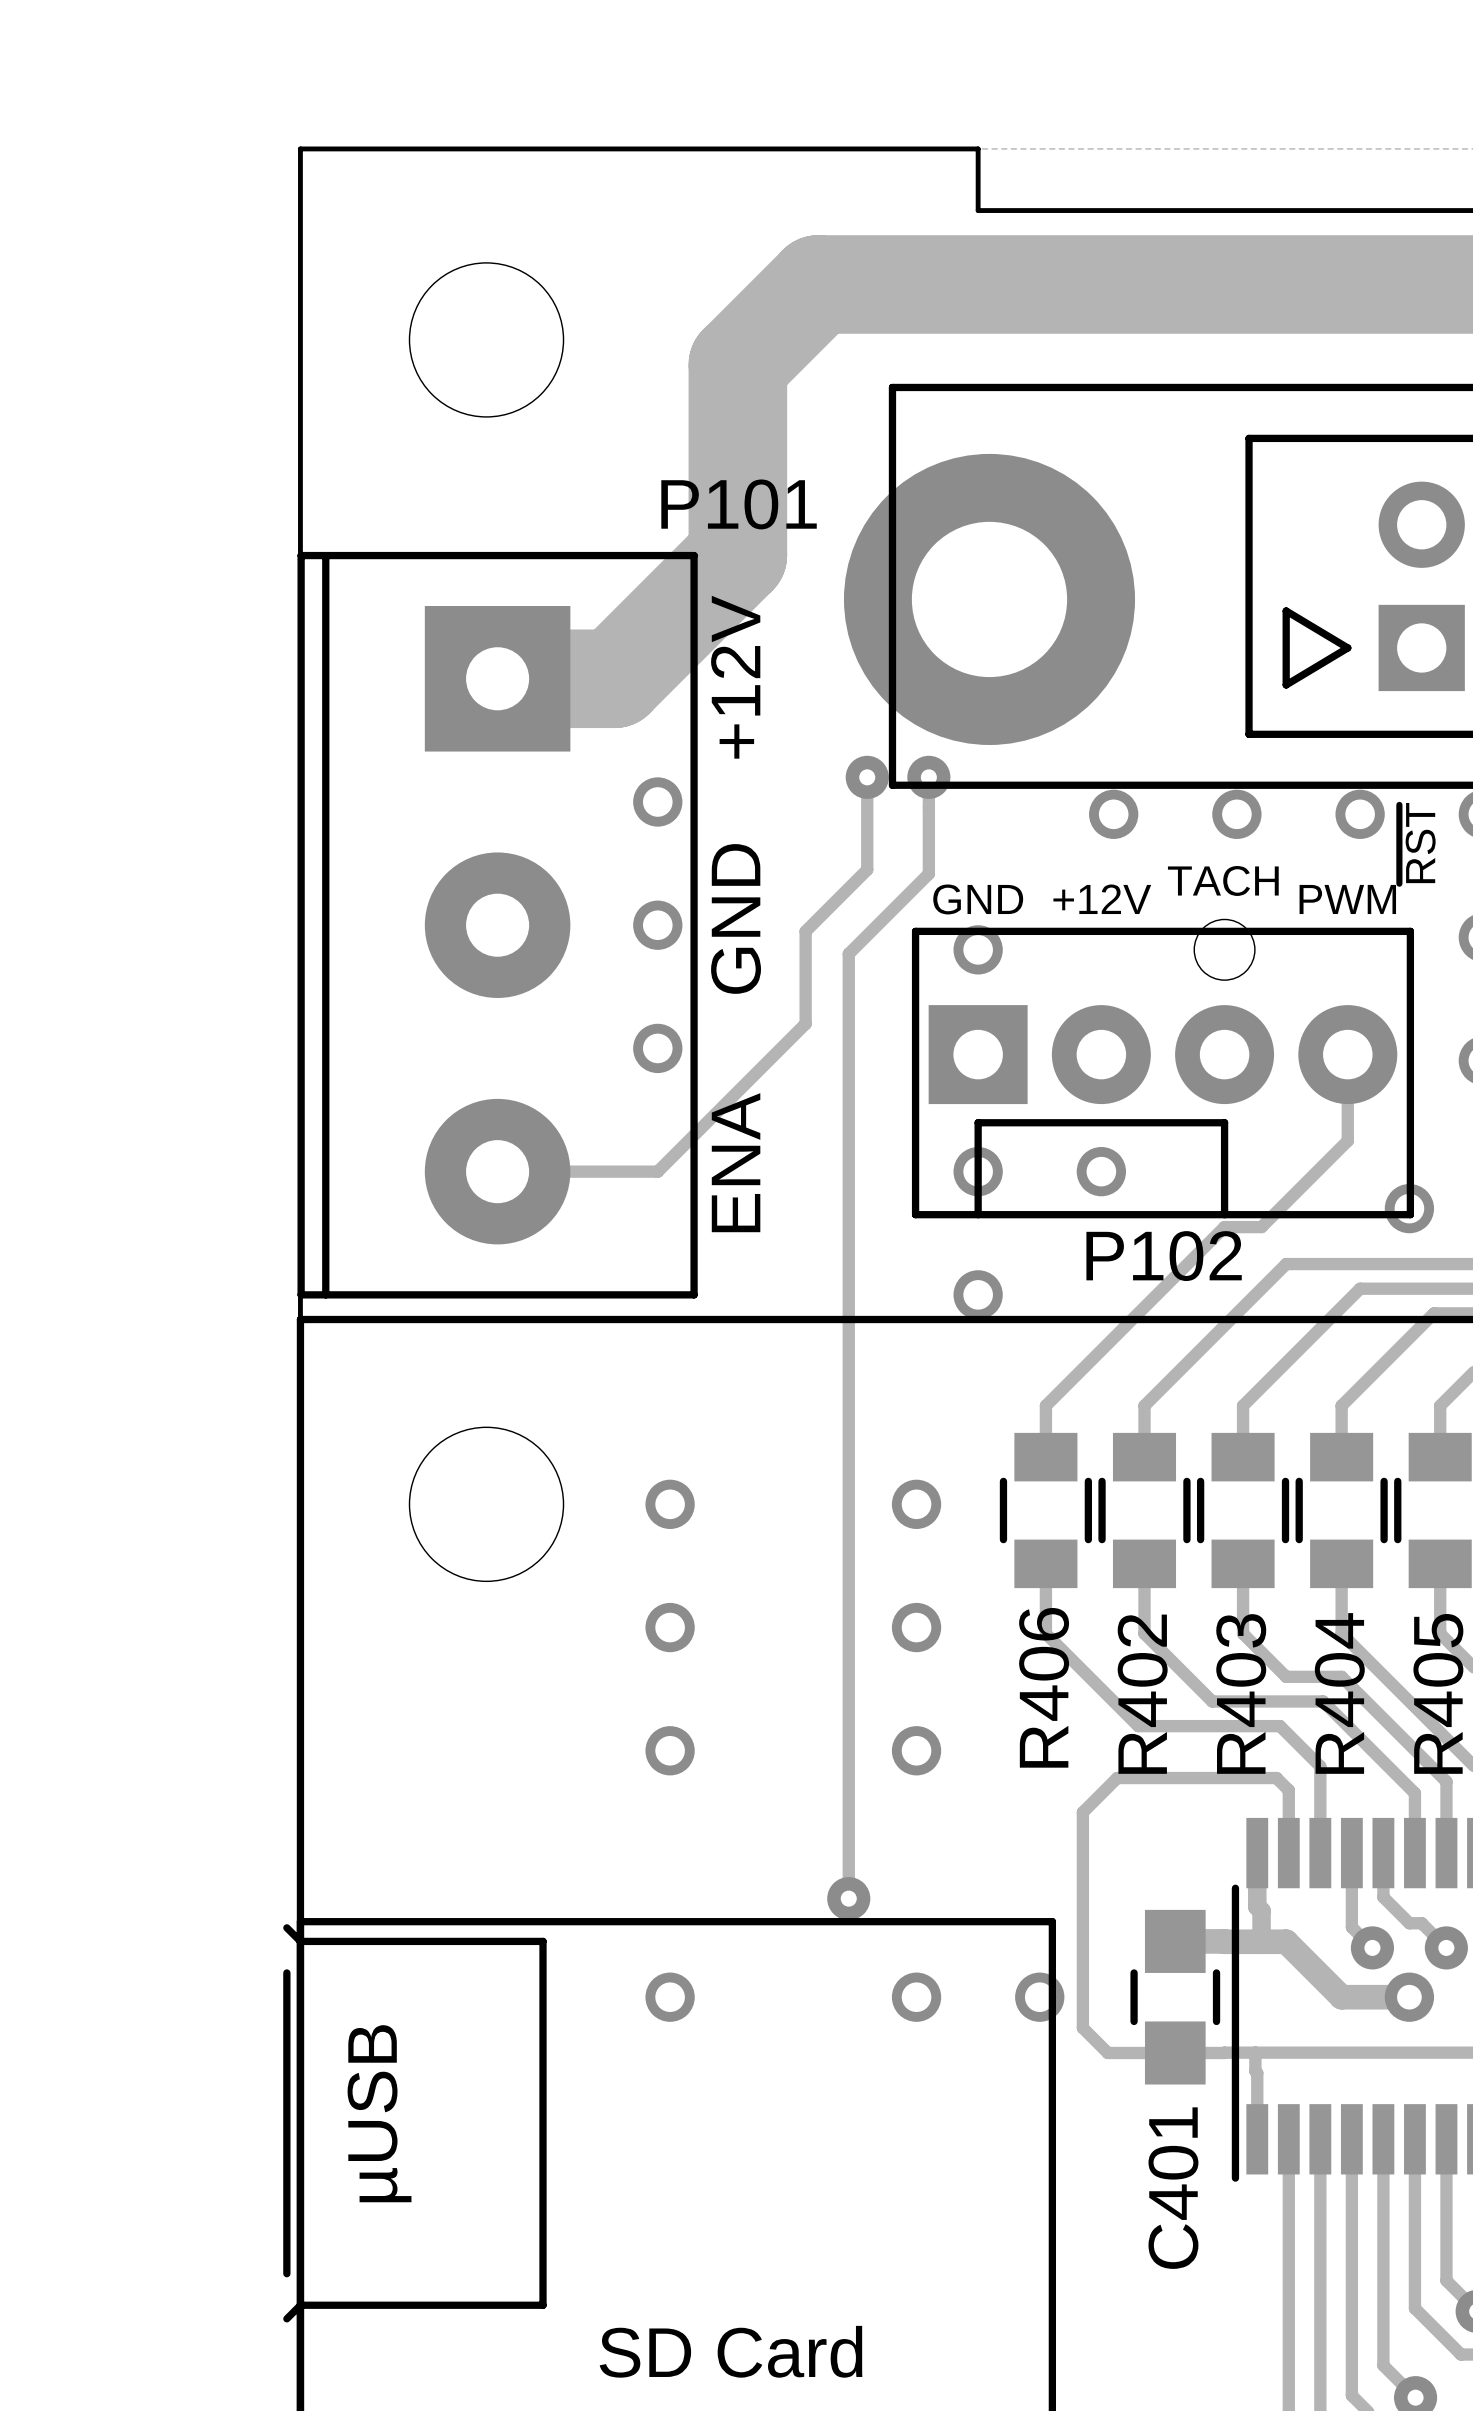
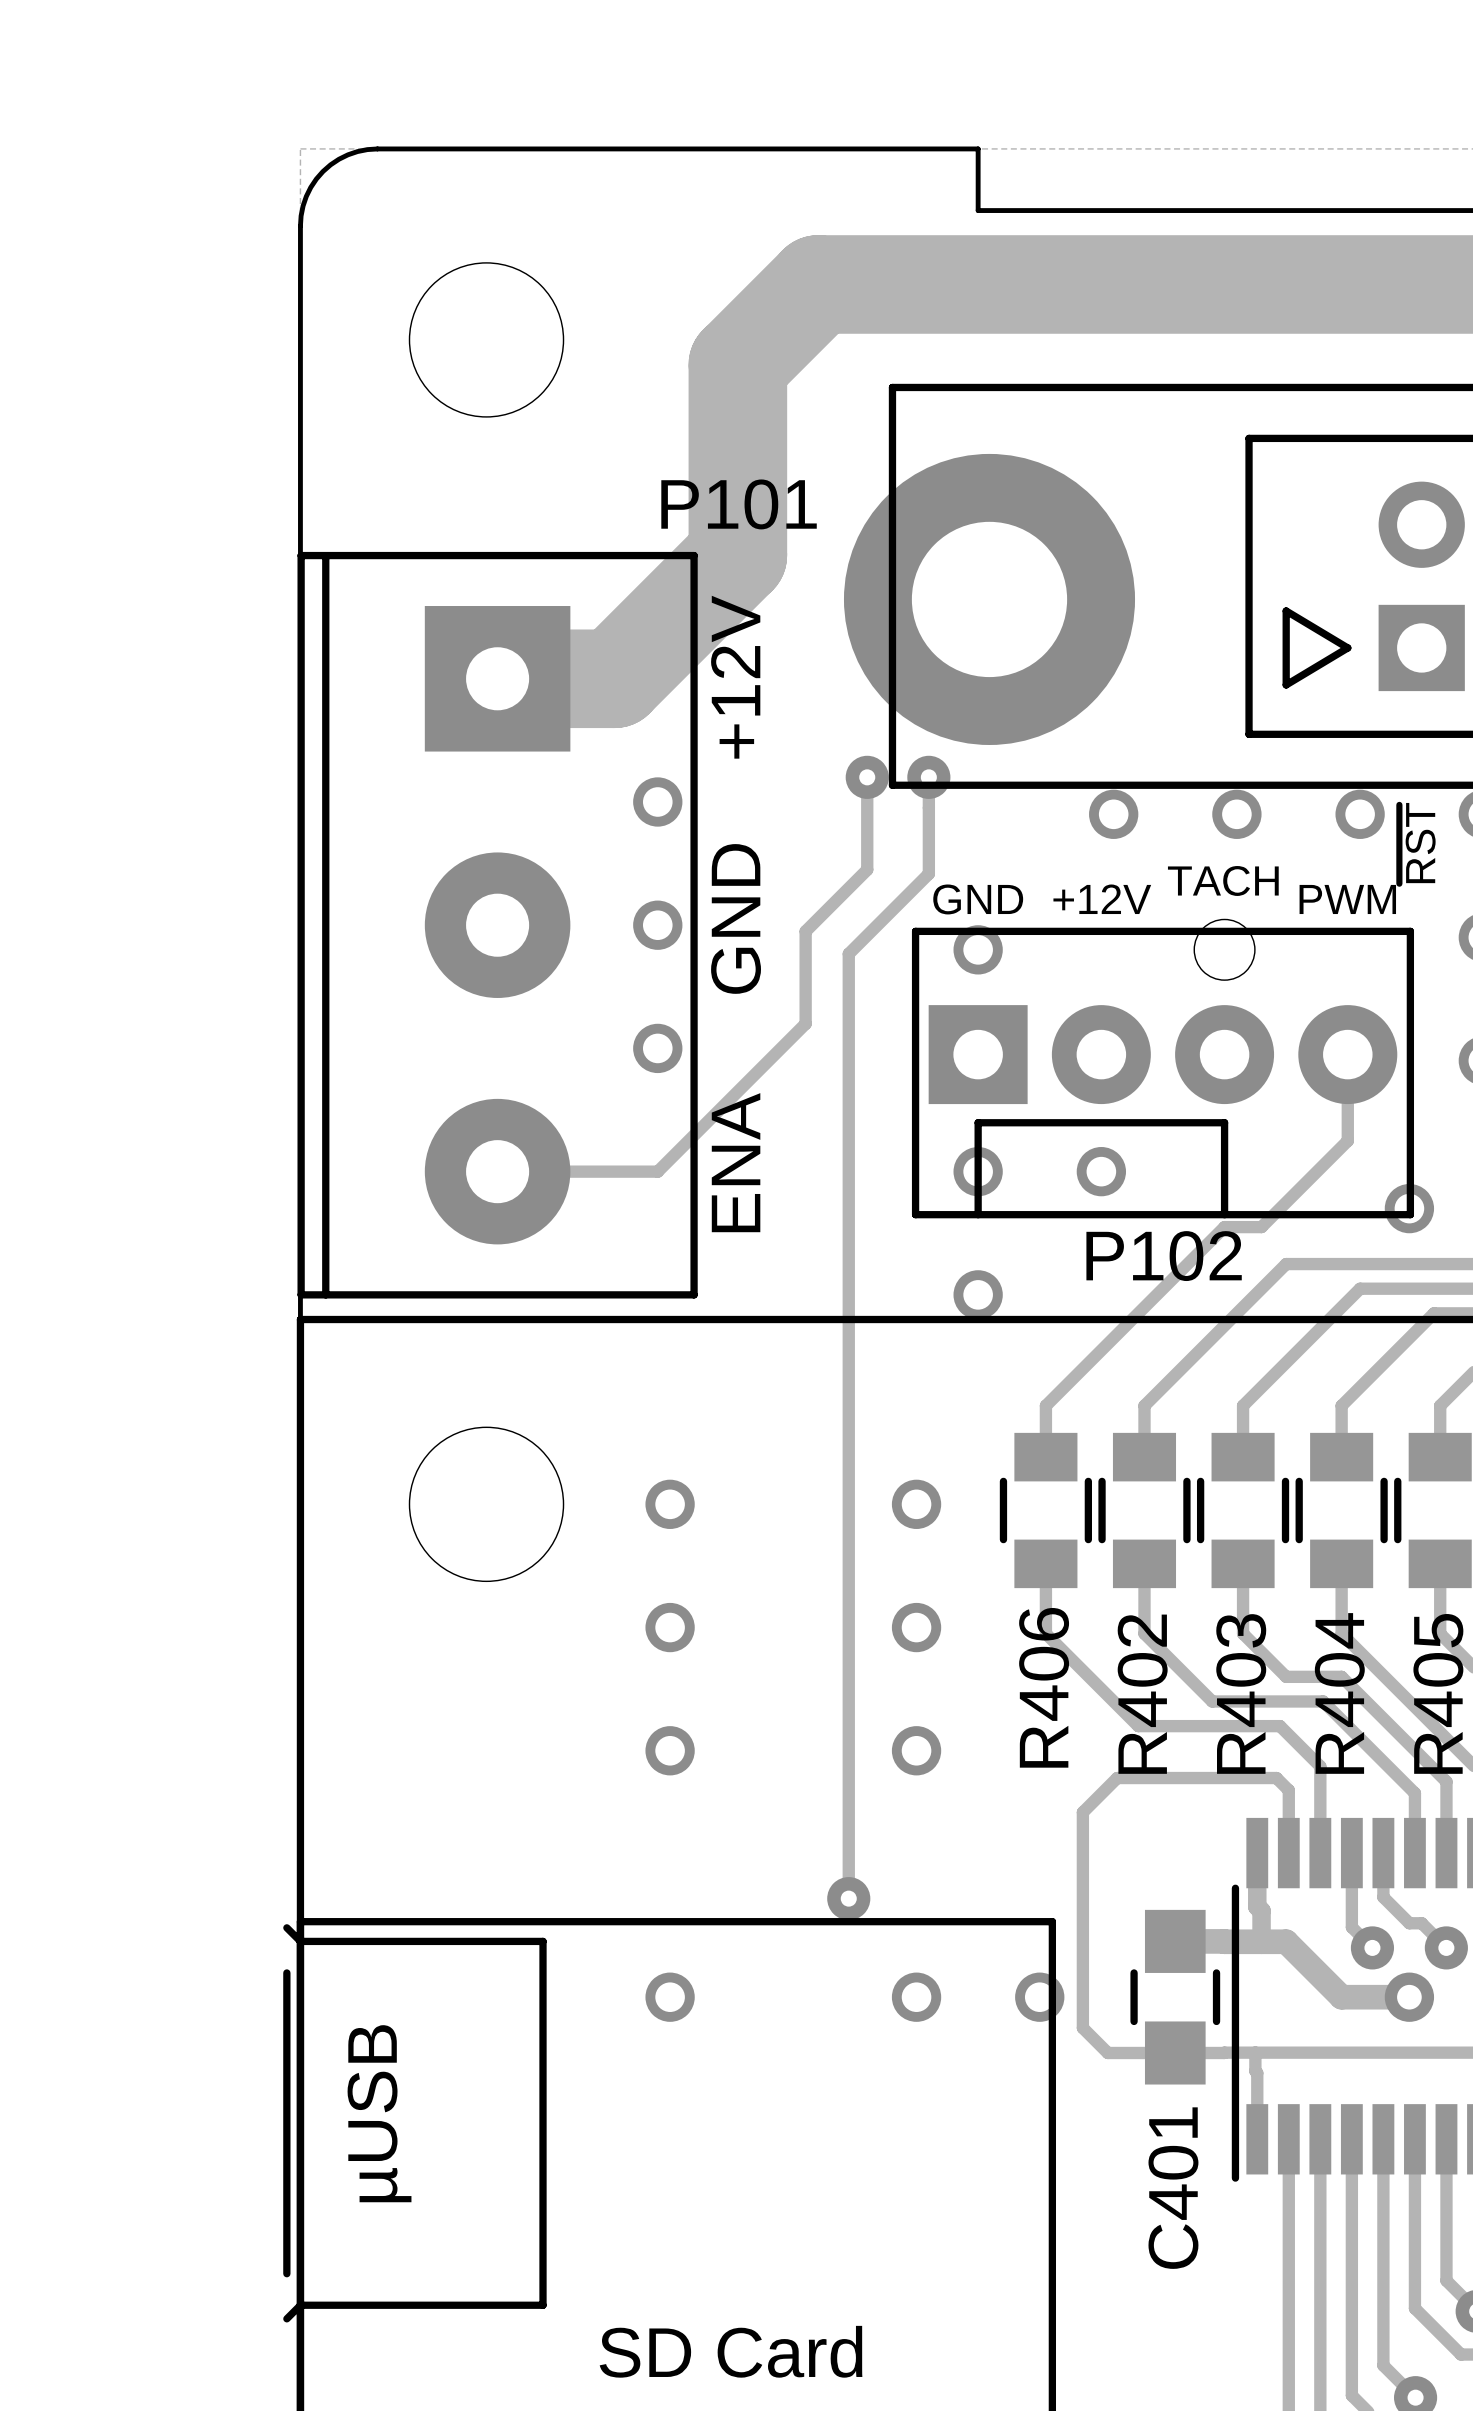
board edge: (377, 148) (300, 148) (300, 225) -> (377, 148) (347, 154) (323, 171) (306, 196) (300, 225)

